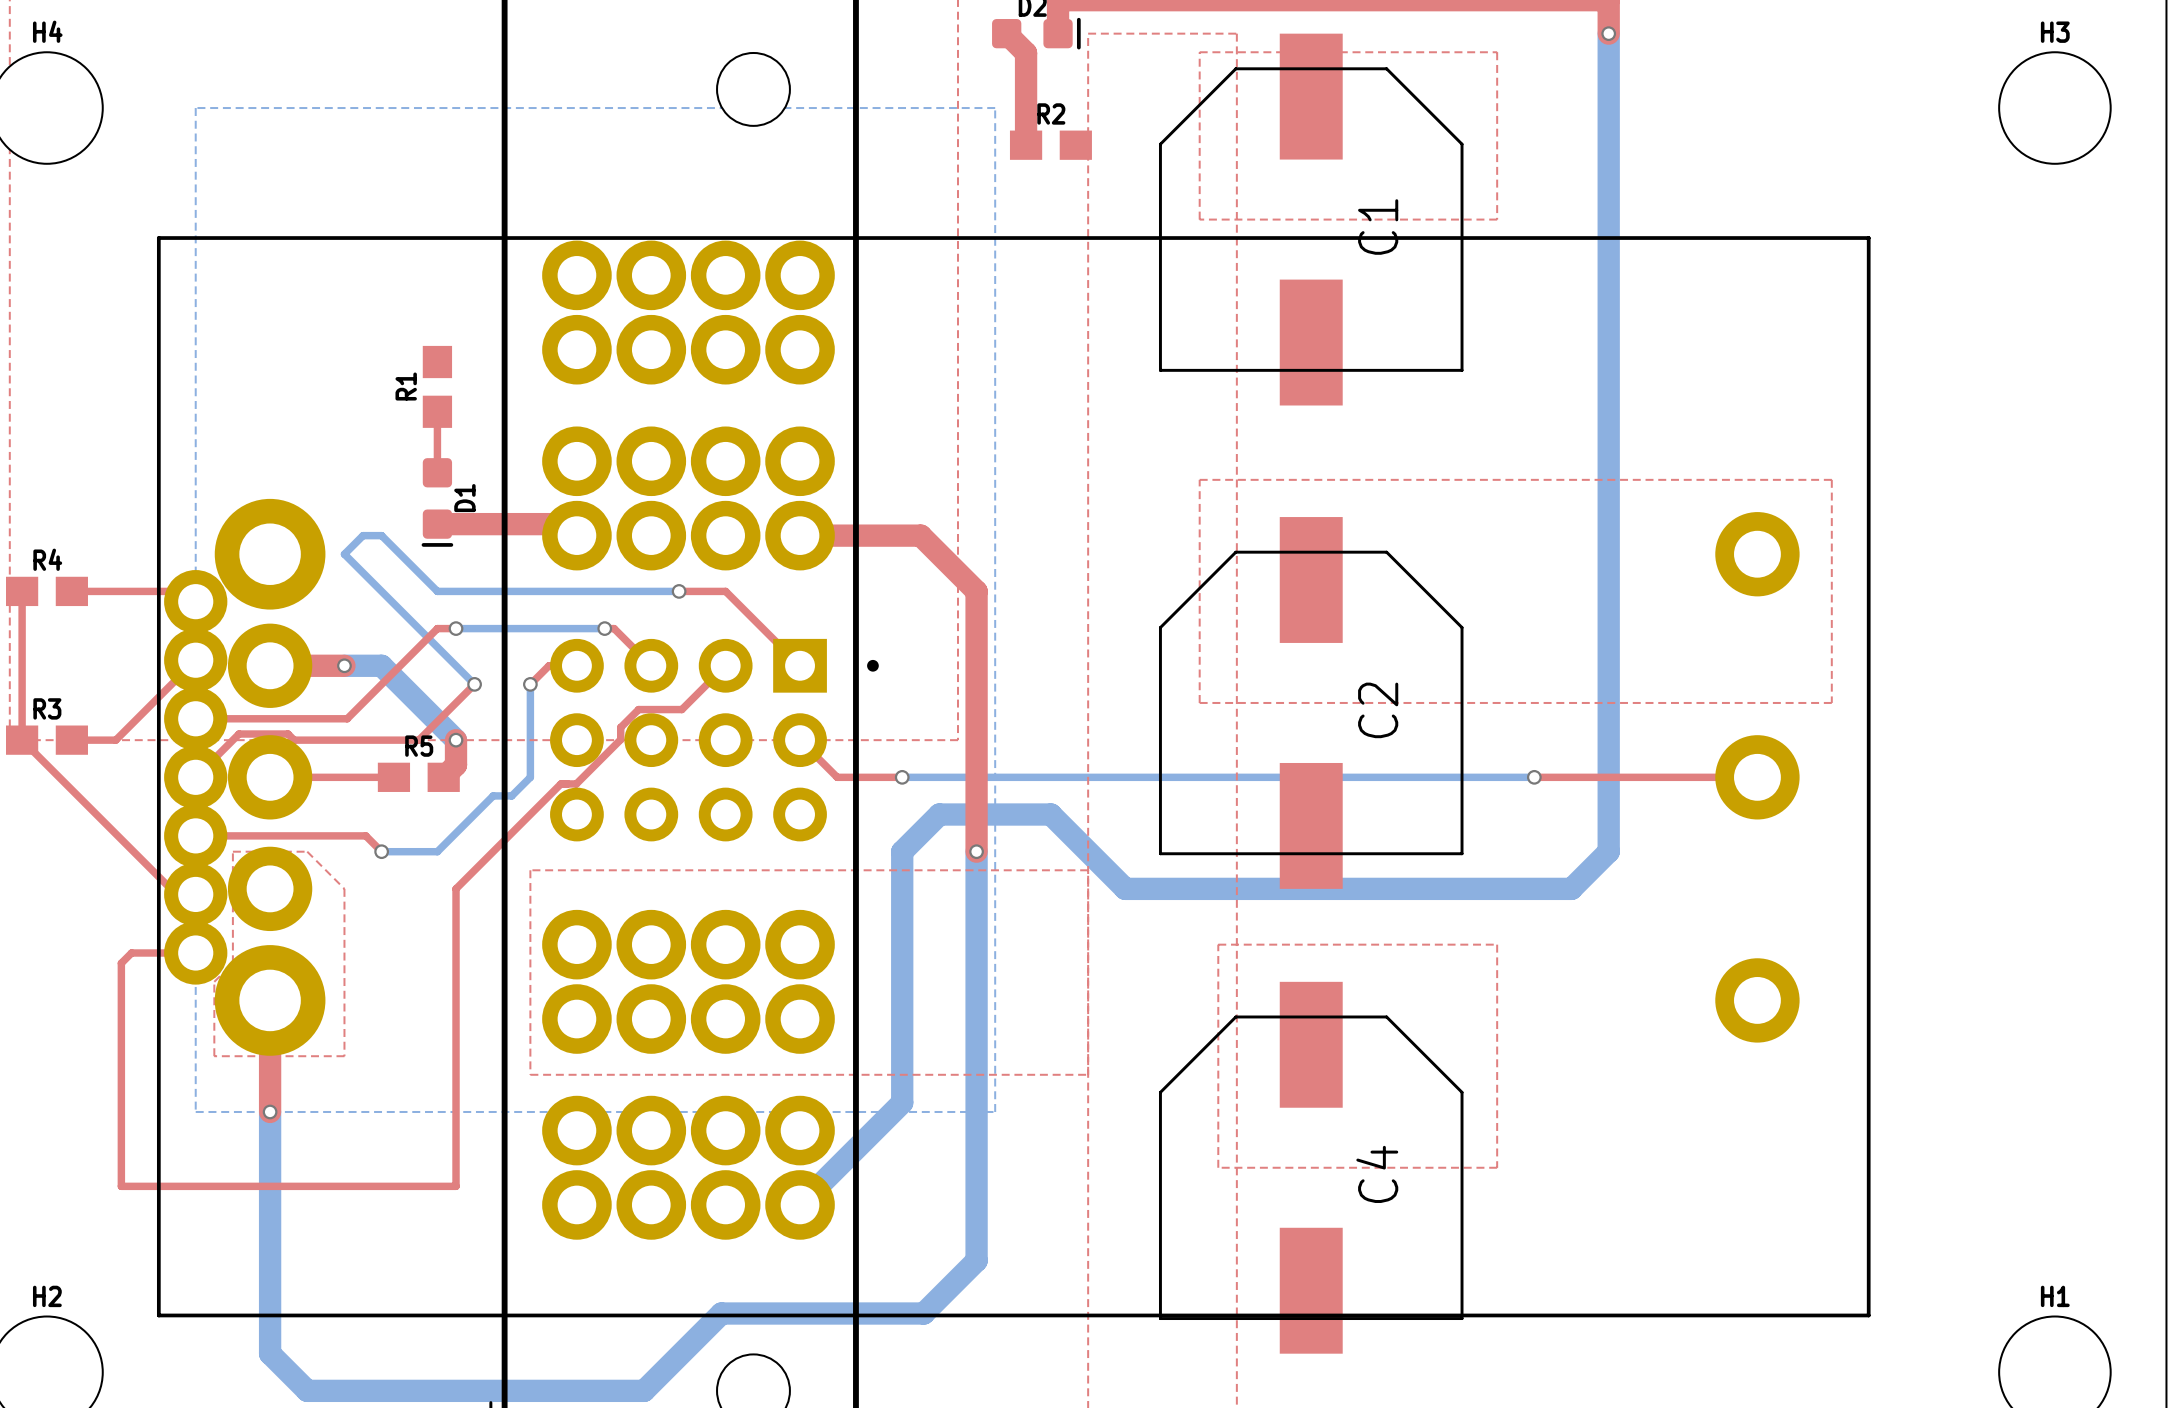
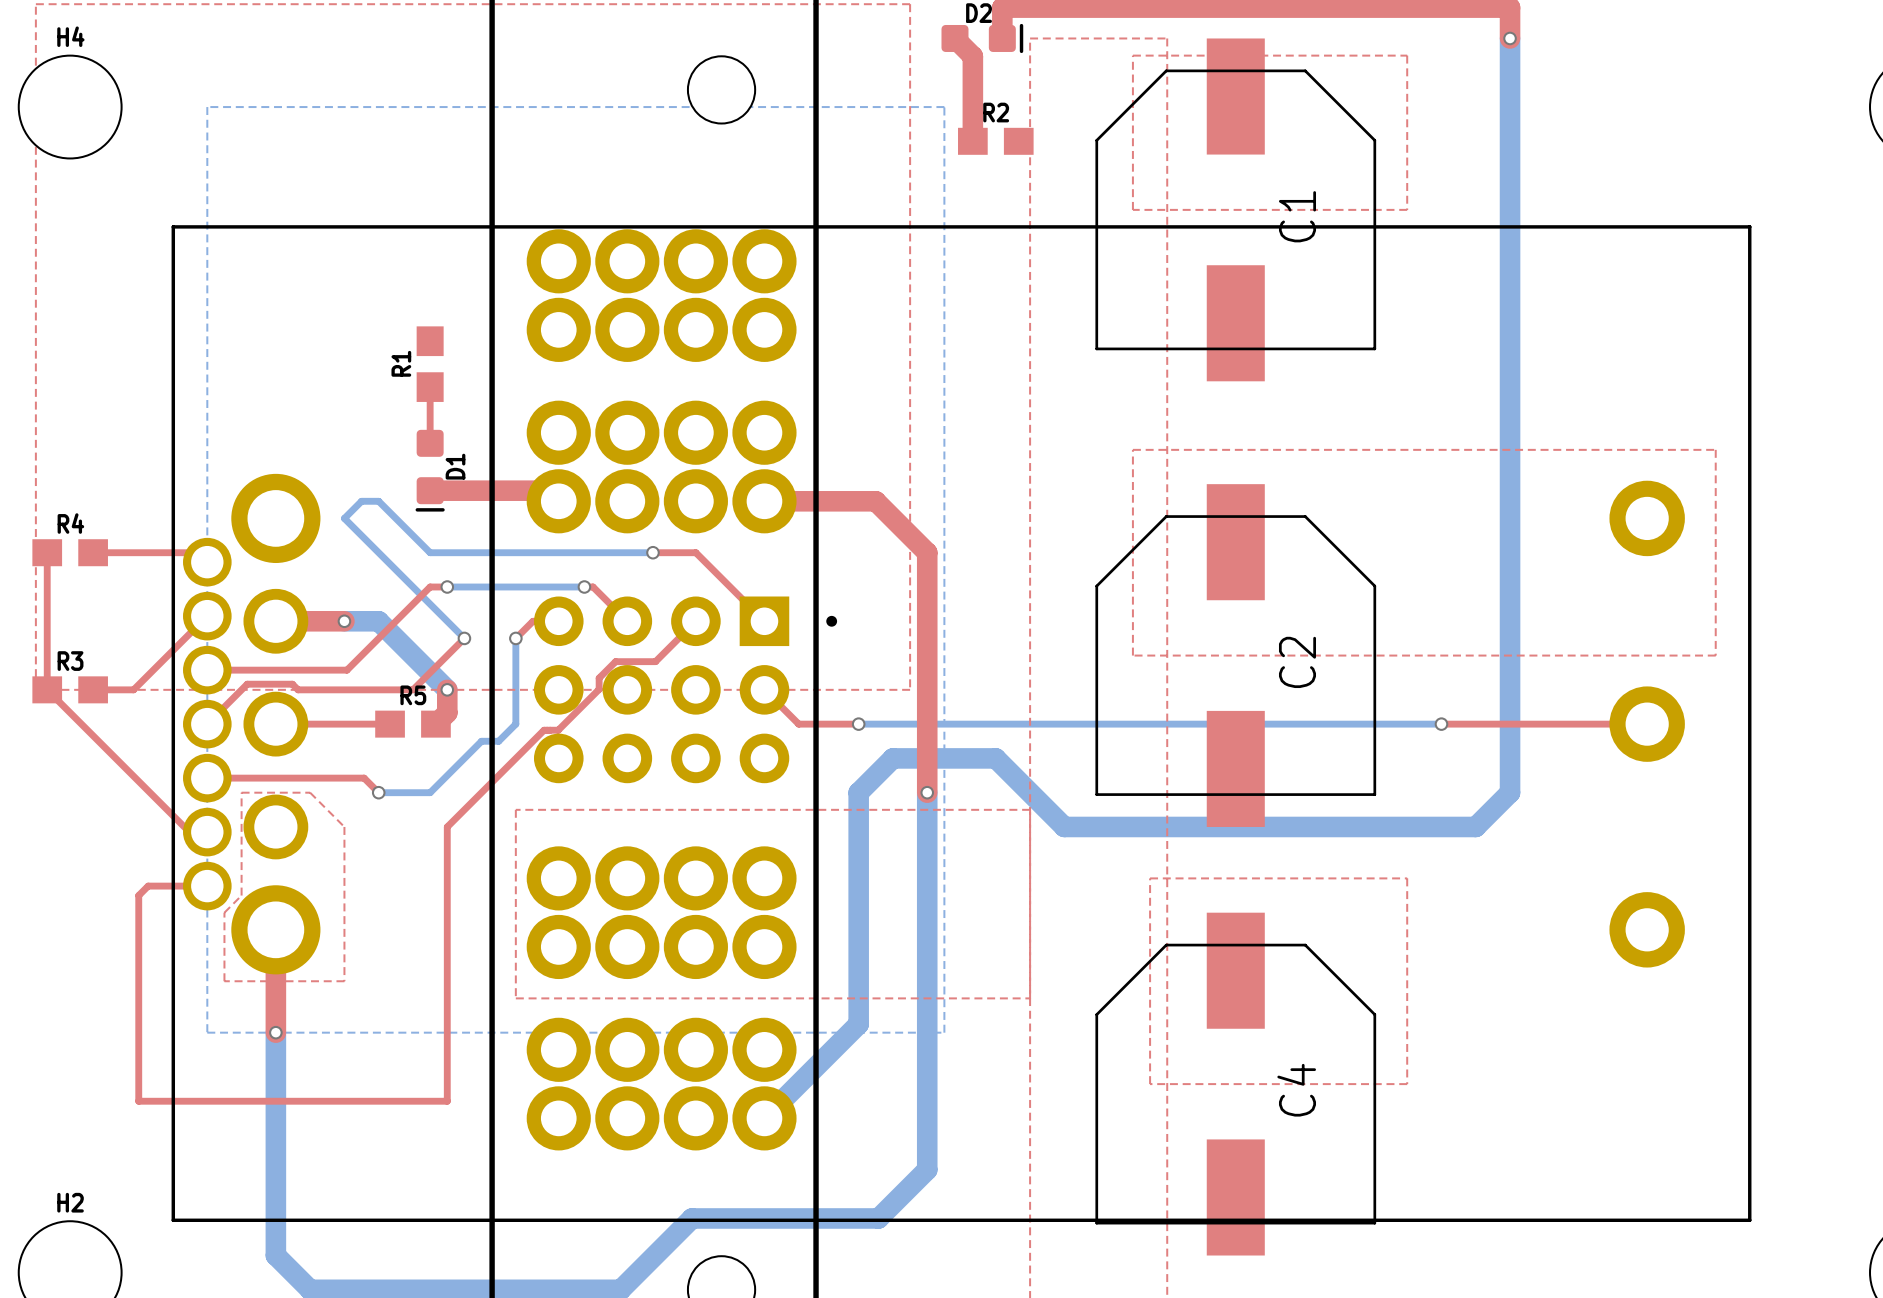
part footprint: [156, 236, 1871, 1318] -> [171, 225, 1752, 1222]

